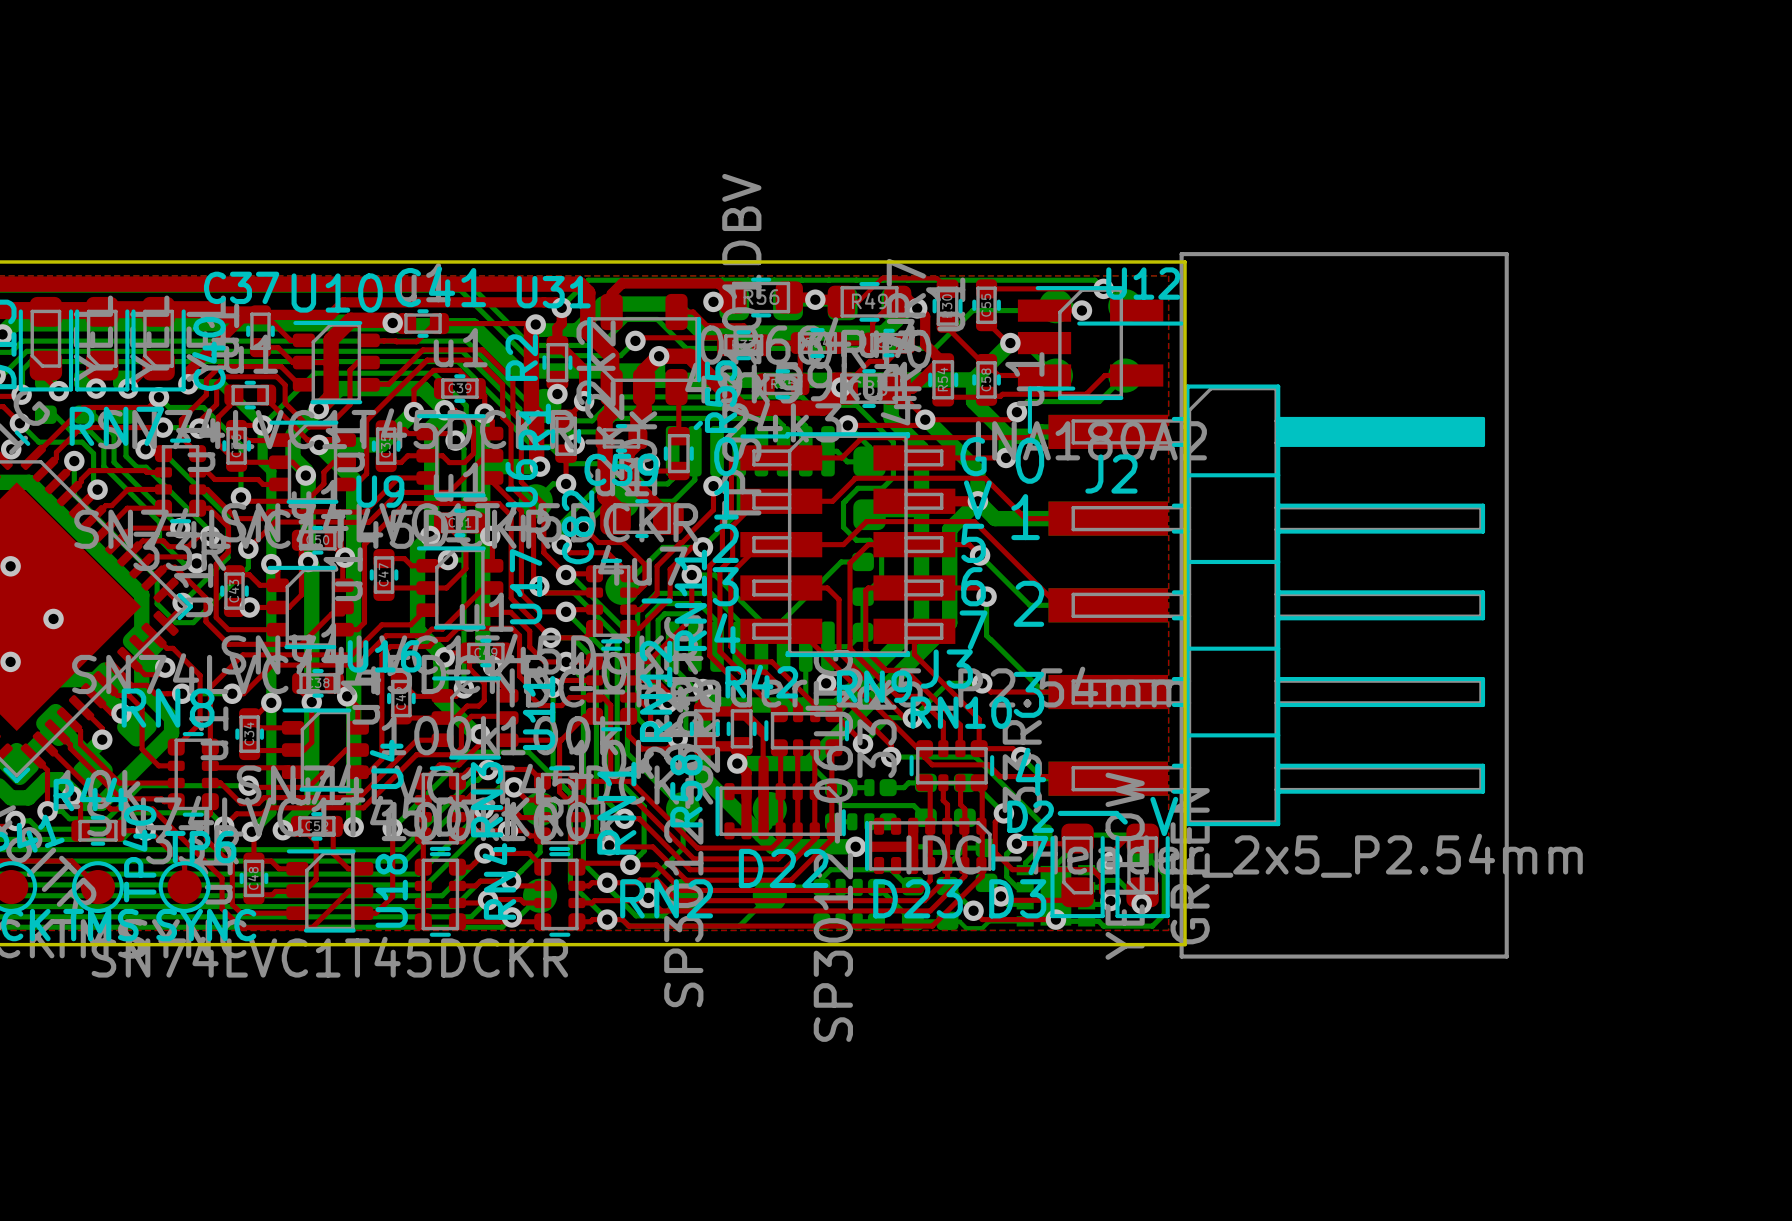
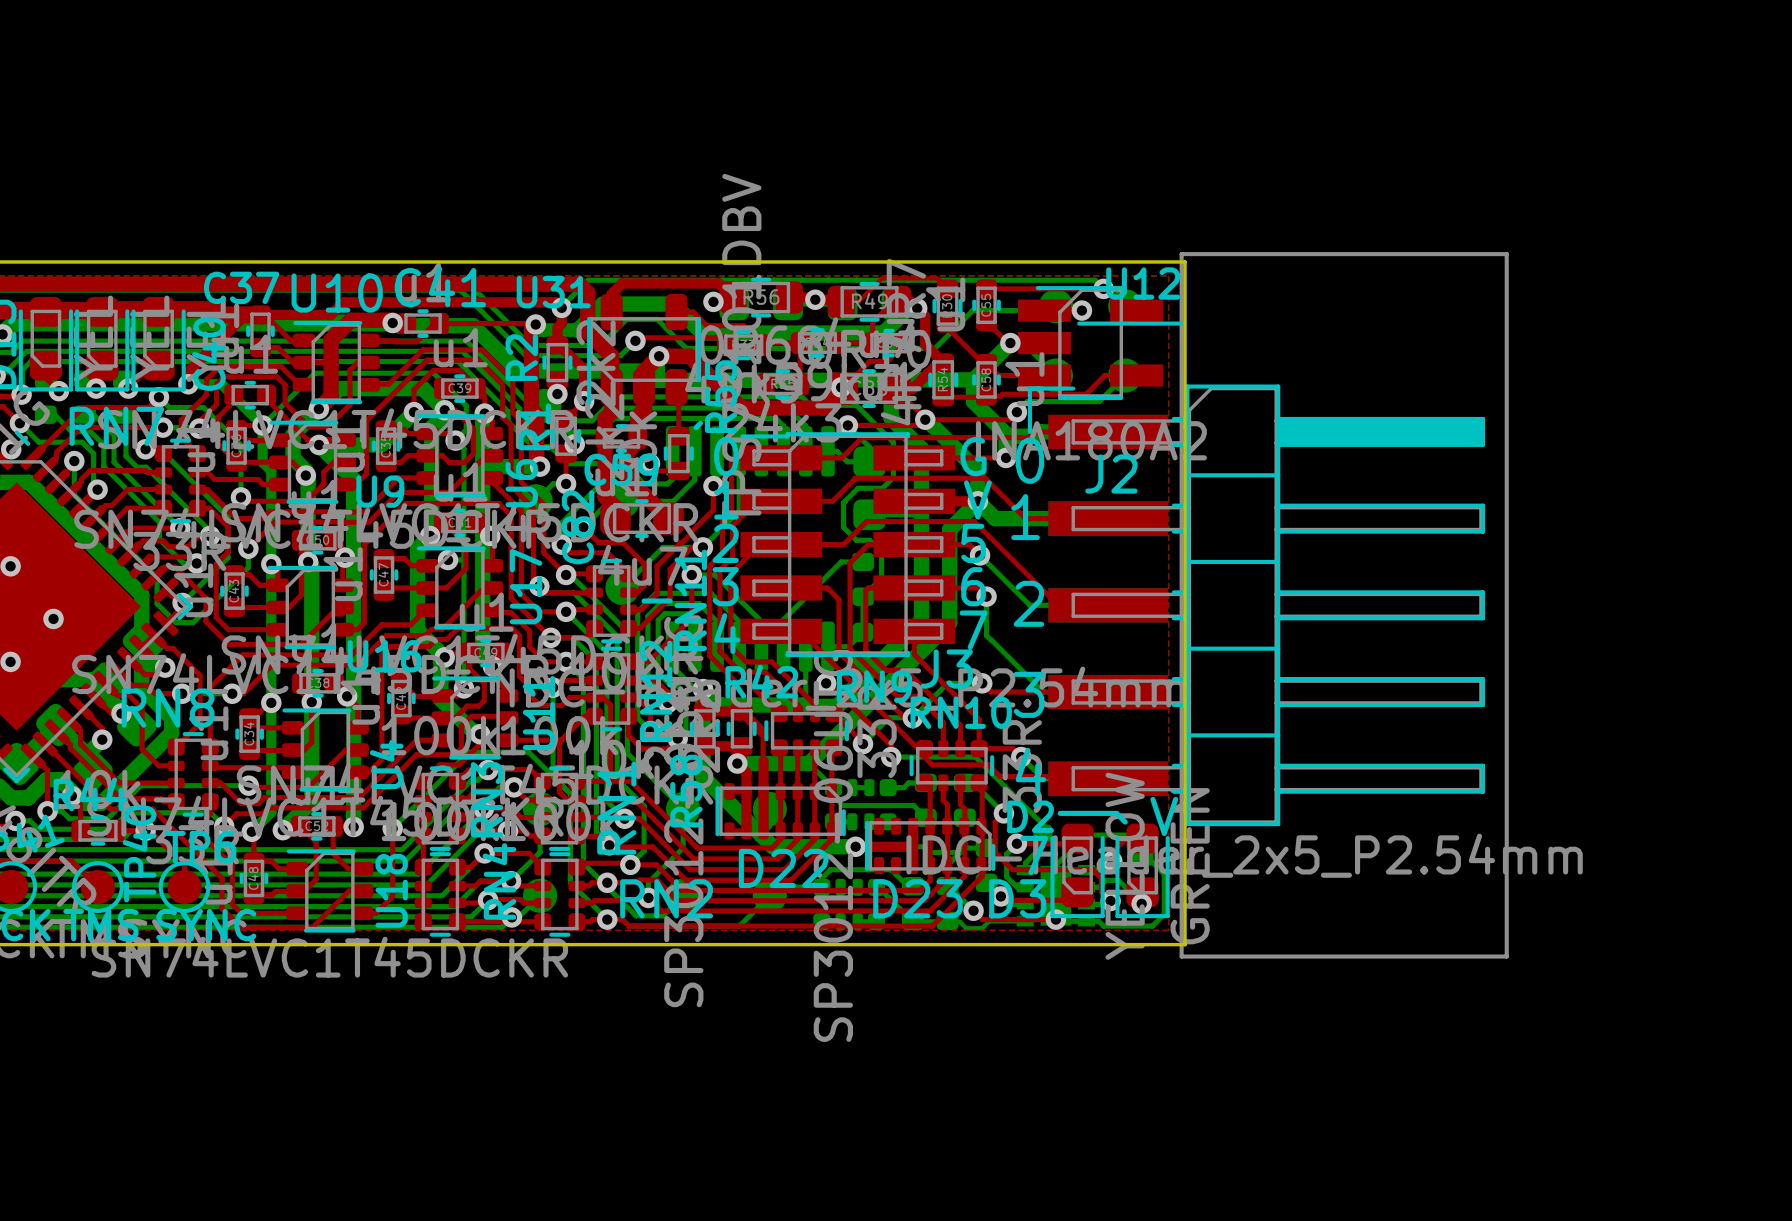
via: (249, 607) -> none

